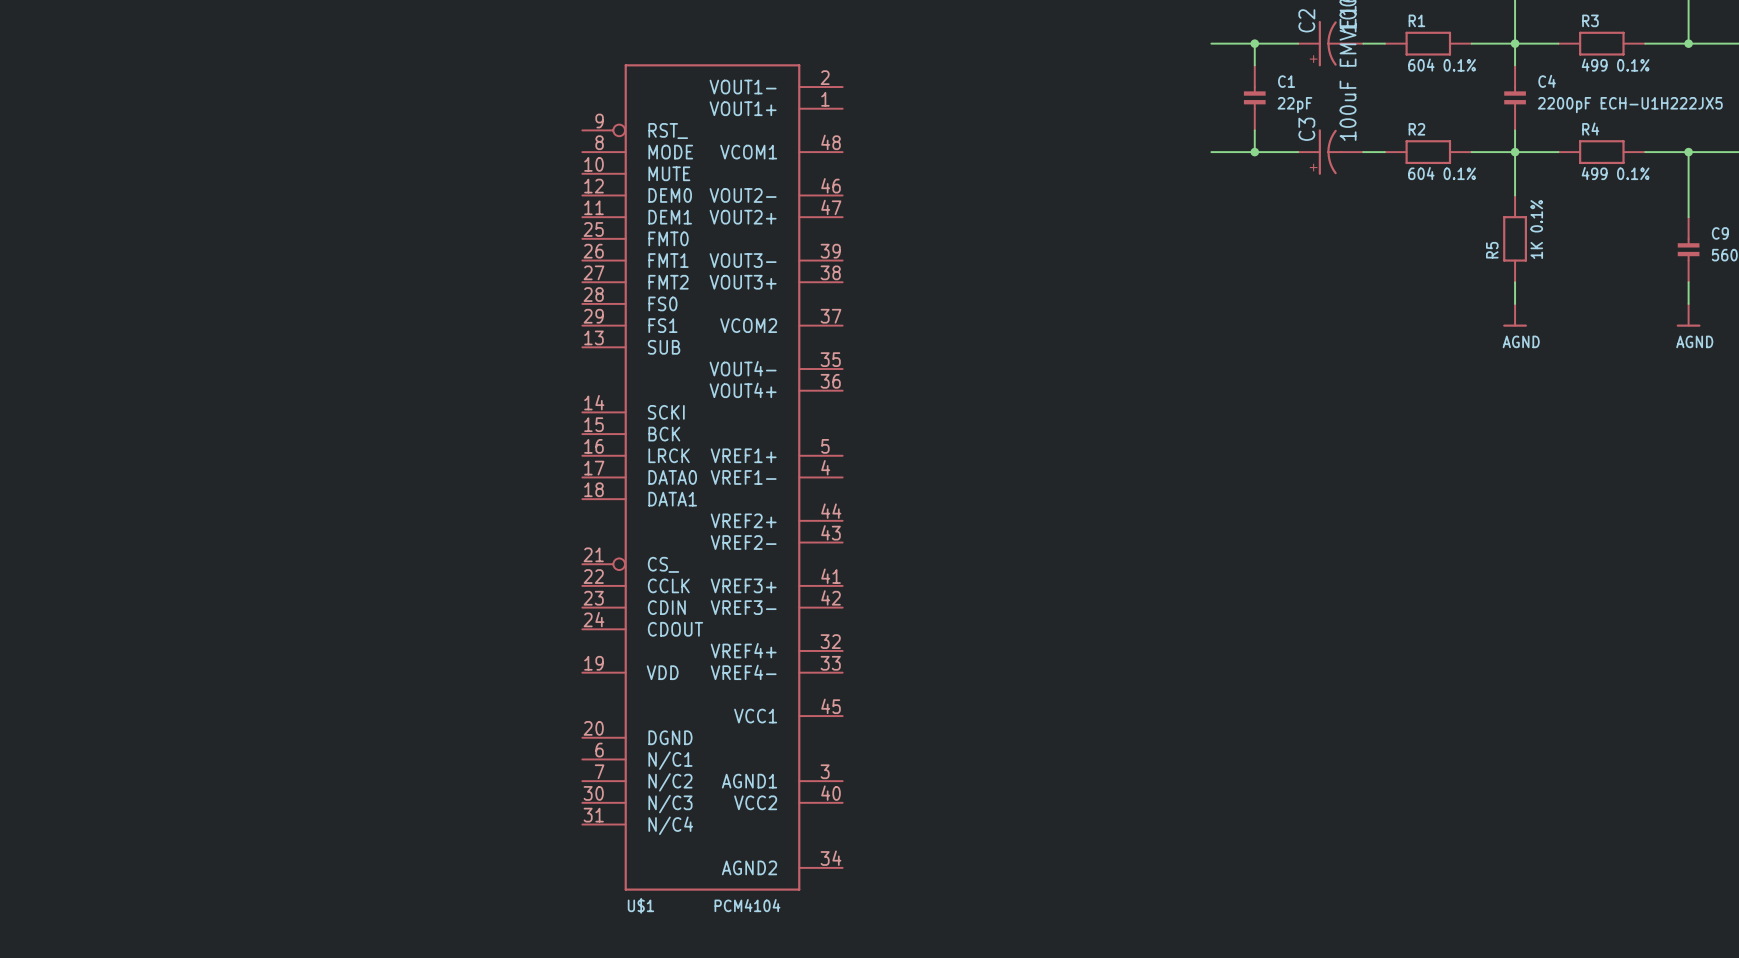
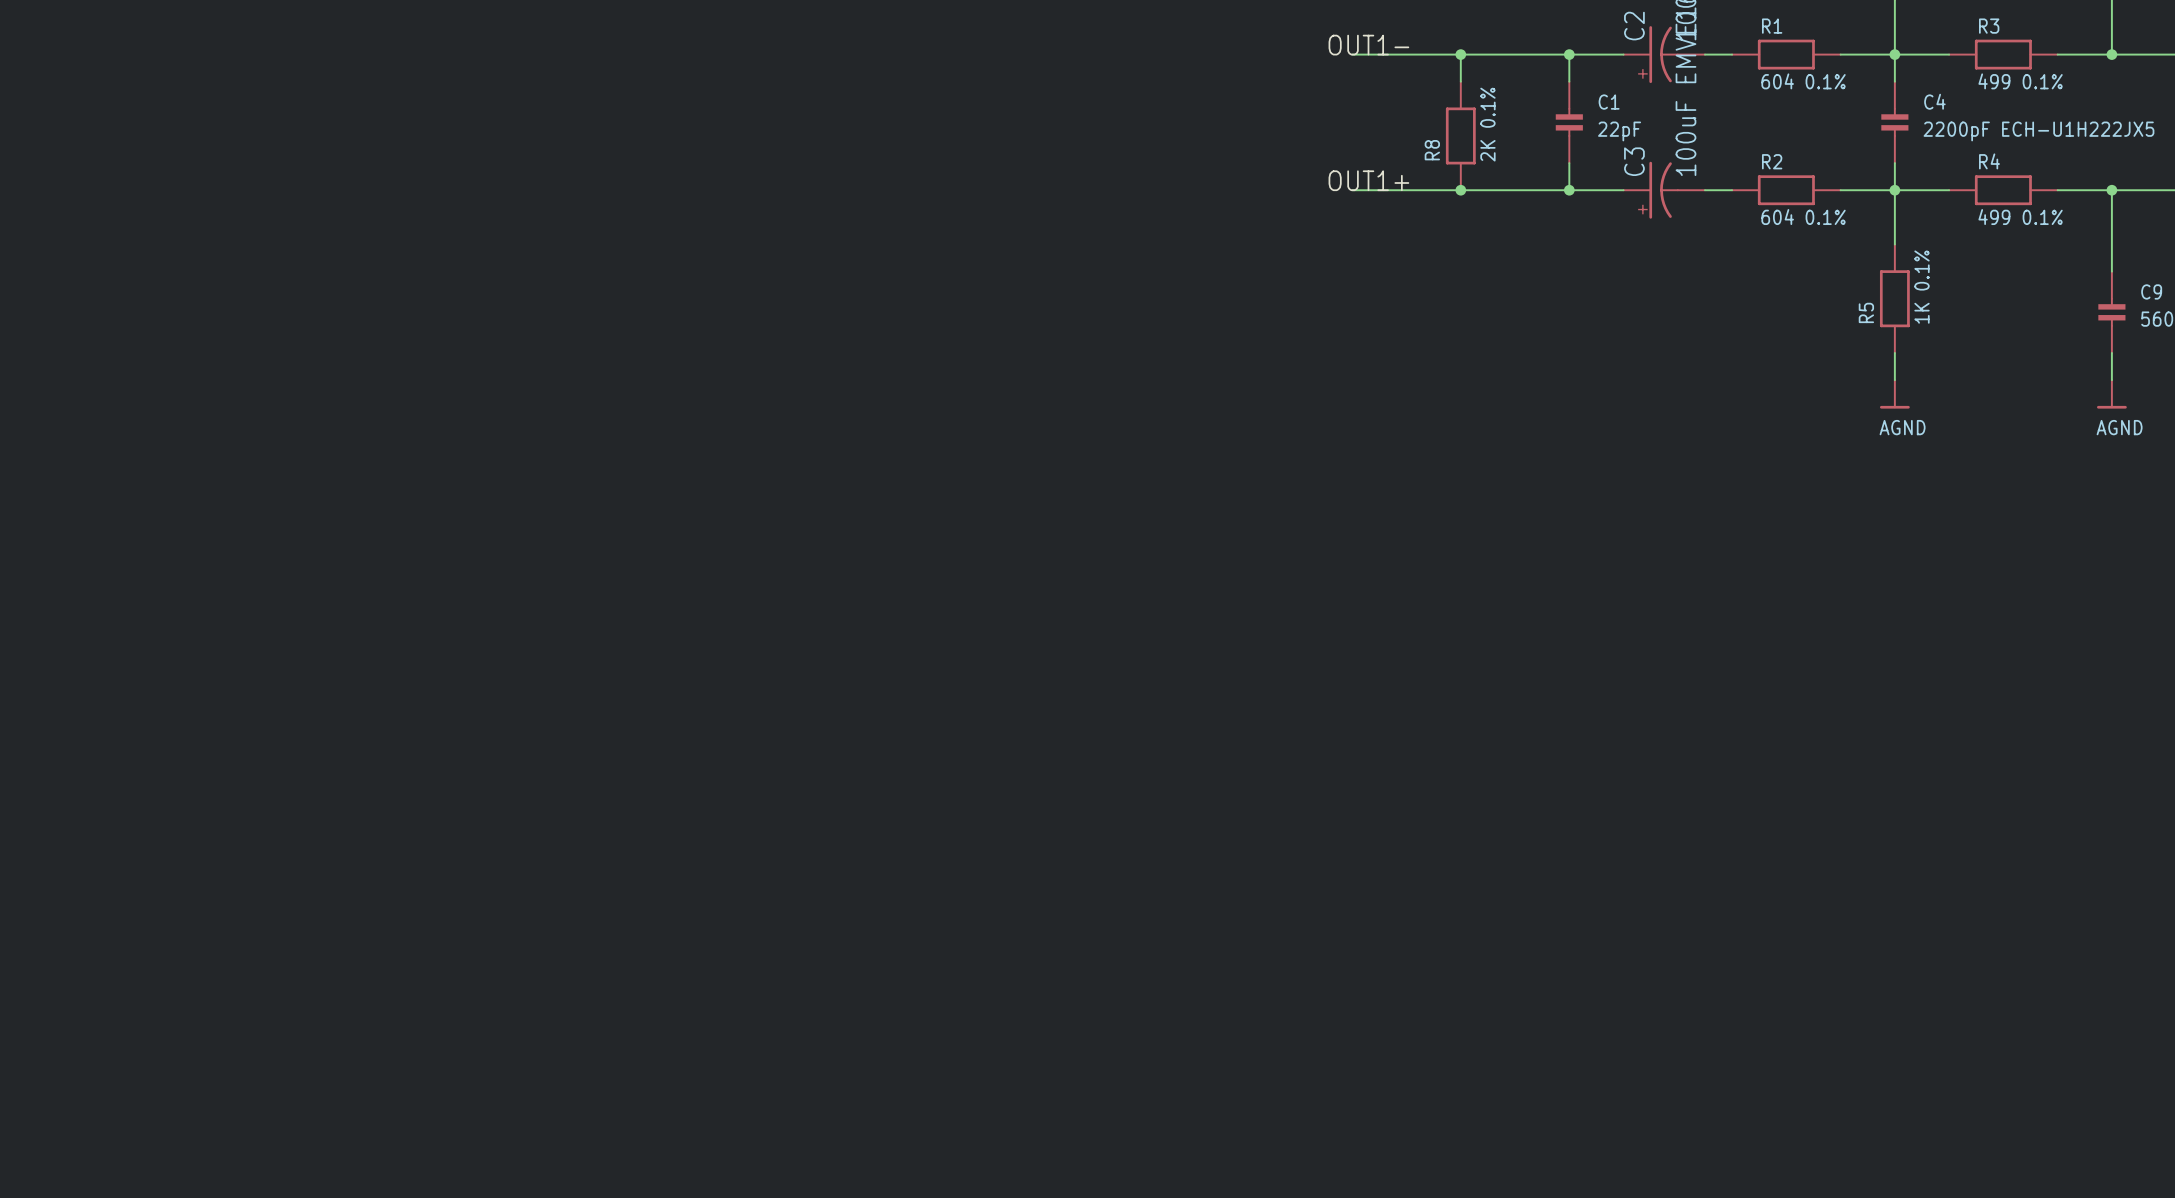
label: none -> OUT1- (1368, 45)
wire: none -> (1352, 54) (1515, 54)
wire: none -> (1460, 54) (1460, 81)
junction: none -> (1460, 54)
R8: none -> 2K 0.1% (1460, 135)
label: none -> OUT1+ (1368, 180)
wire: none -> (1352, 190) (1515, 190)
junction: none -> (1460, 190)
U$1: PCM4104 (712, 477) -> none

